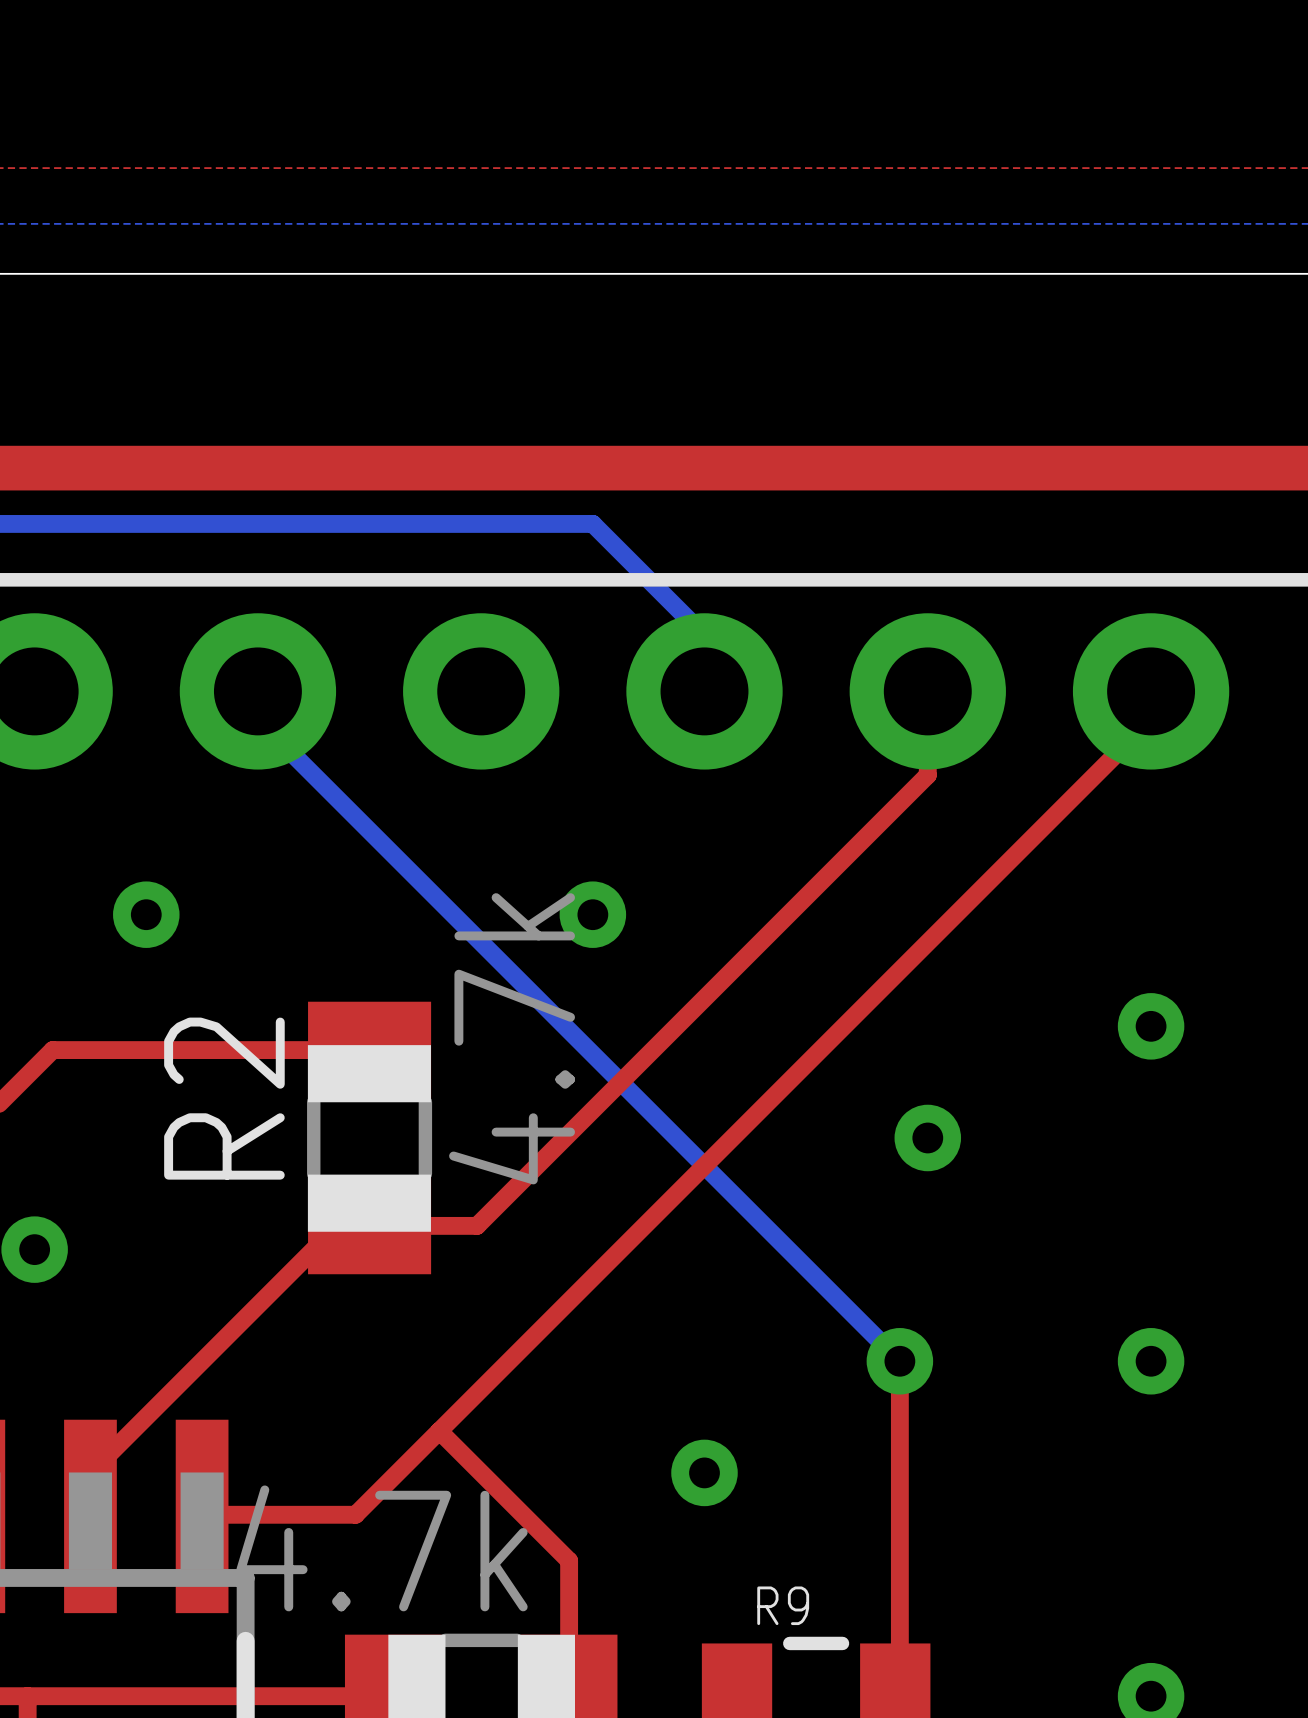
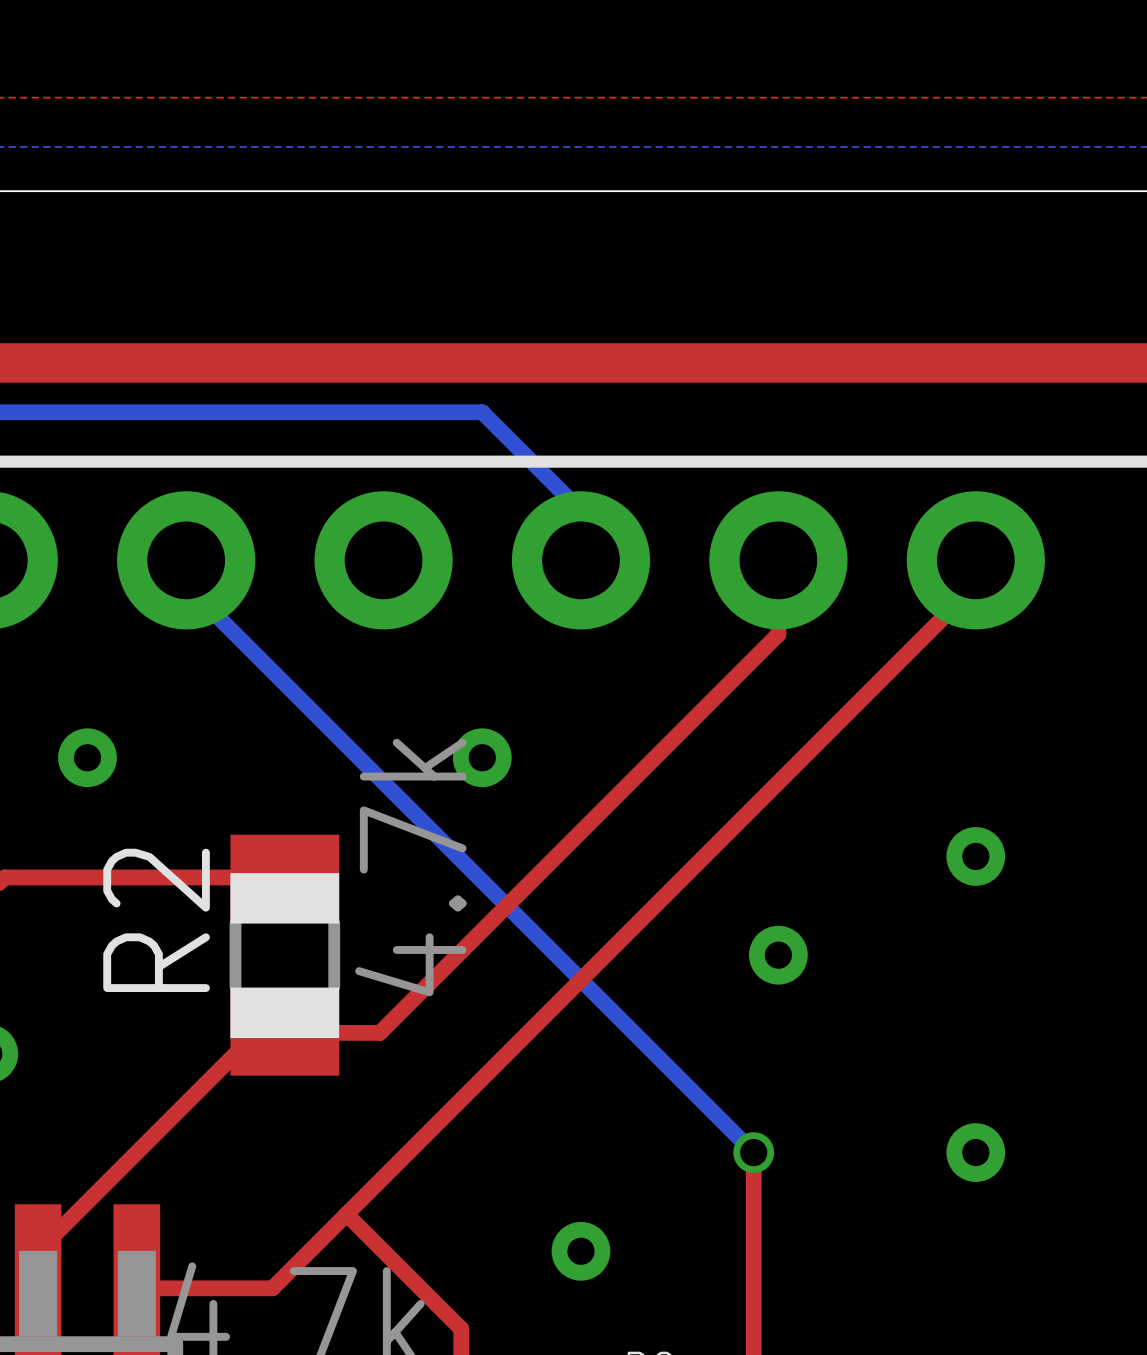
via size: [866, 1328, 934, 1395] -> [733, 1132, 775, 1173]

